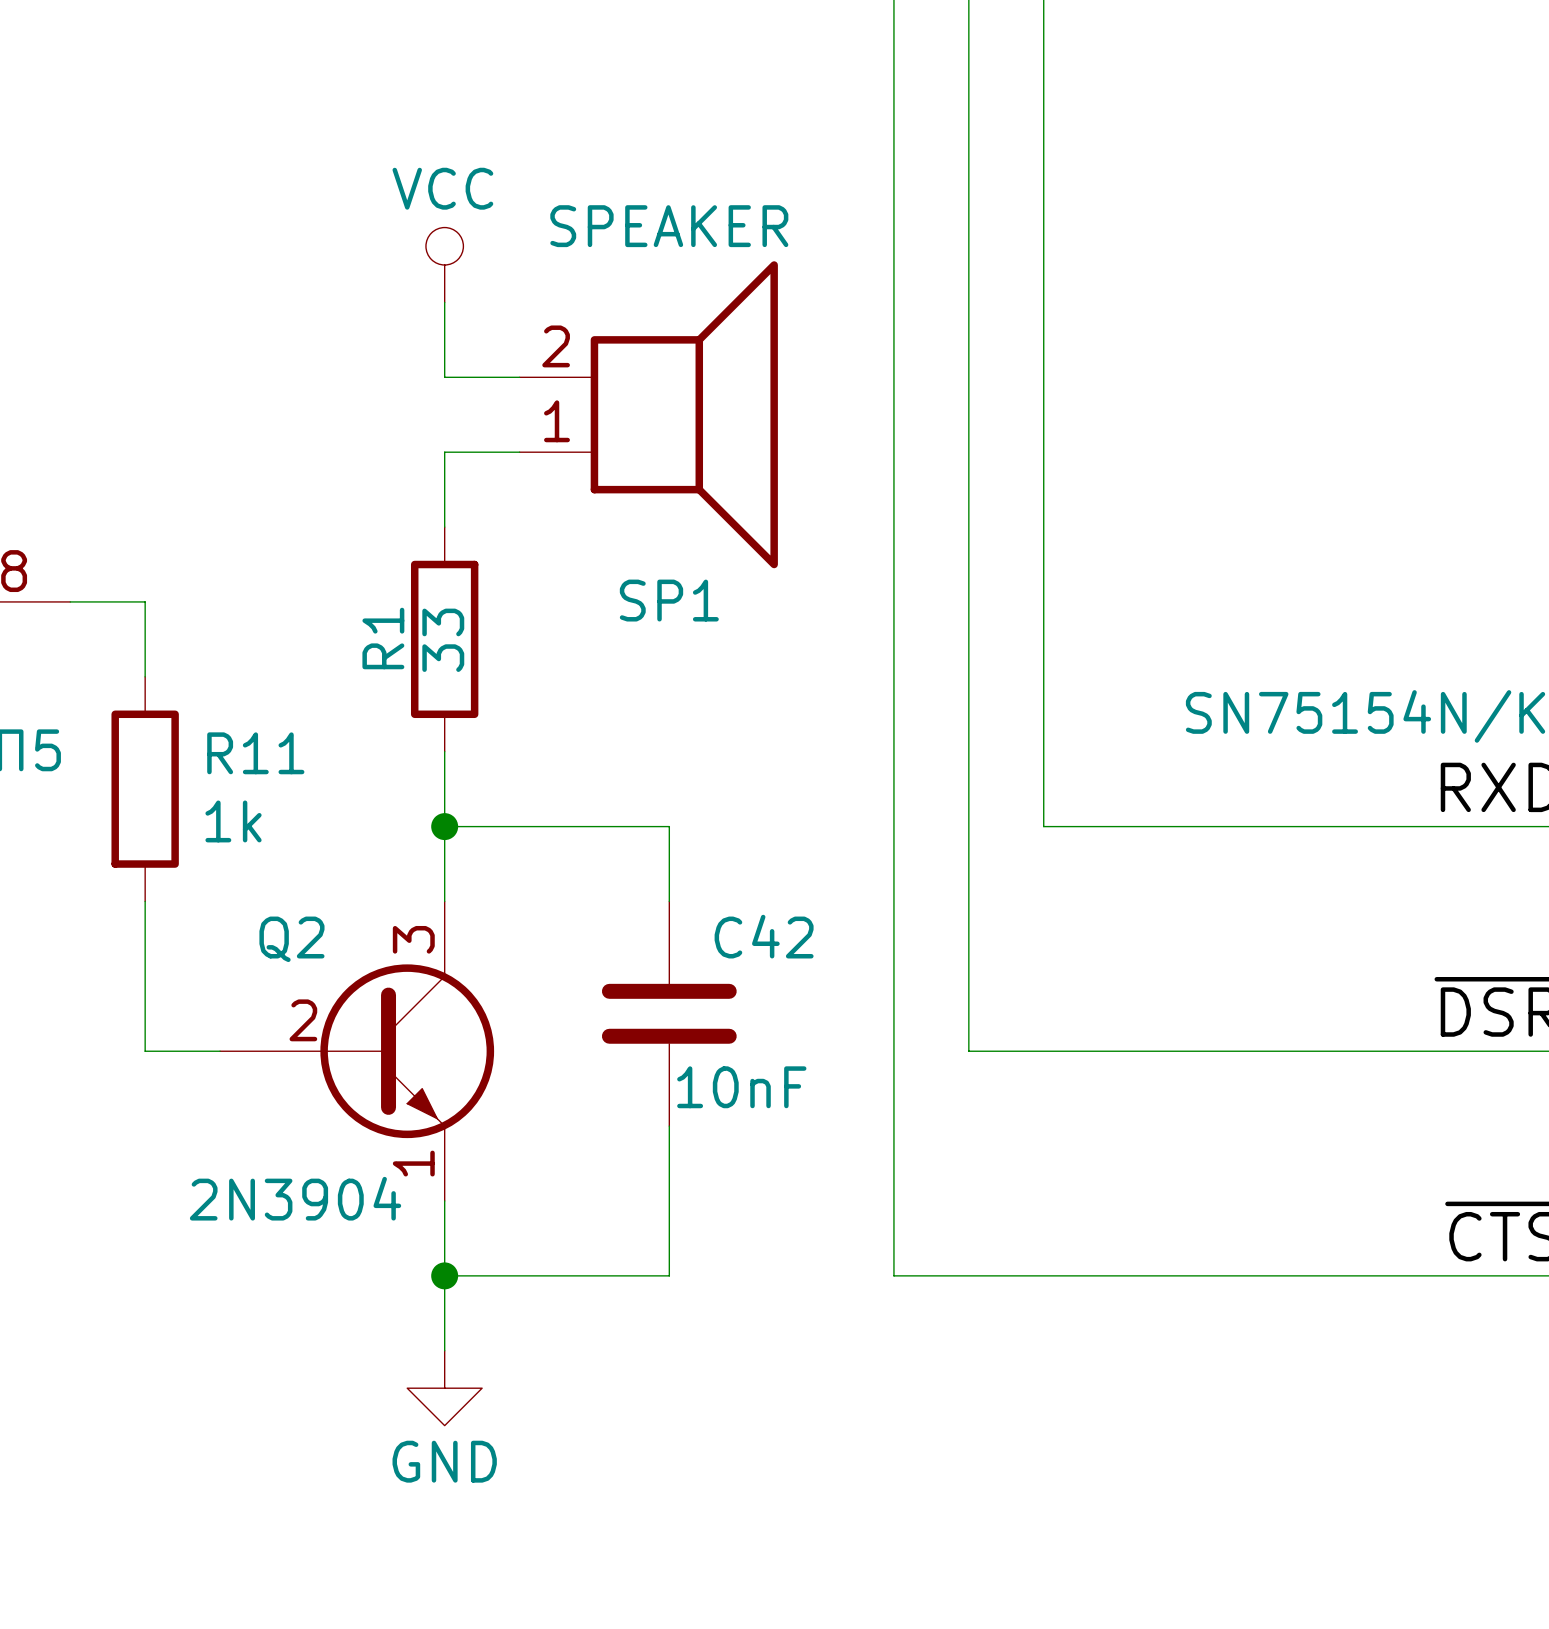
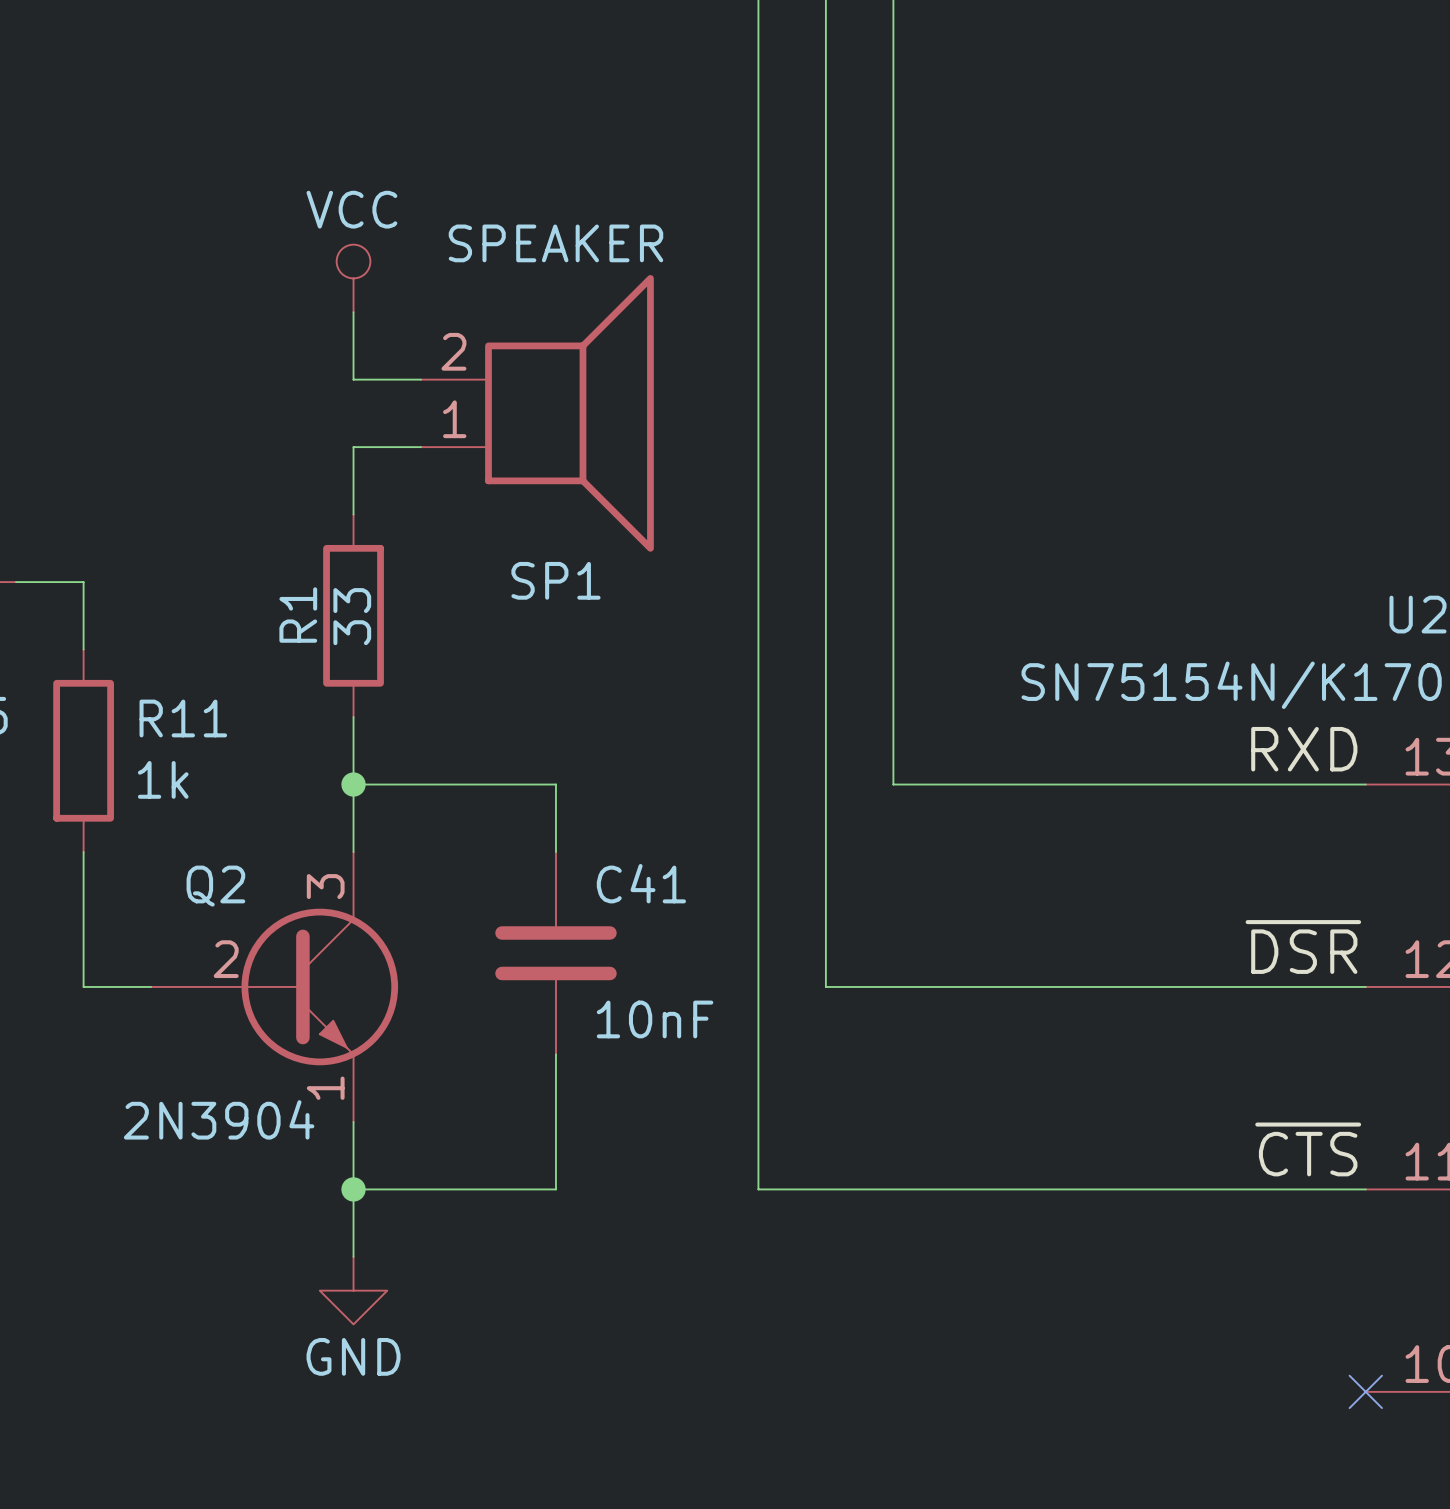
C42 name: C42 (764, 936) -> C41 (641, 883)
C42 value position: 10nF (741, 1087) -> 10nF (655, 1019)

